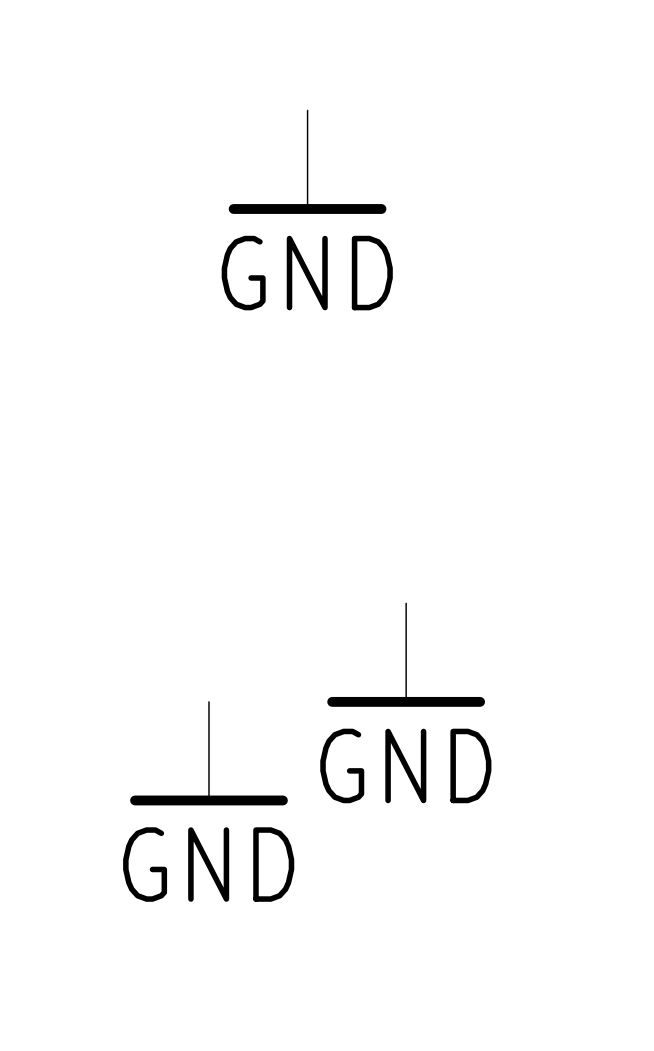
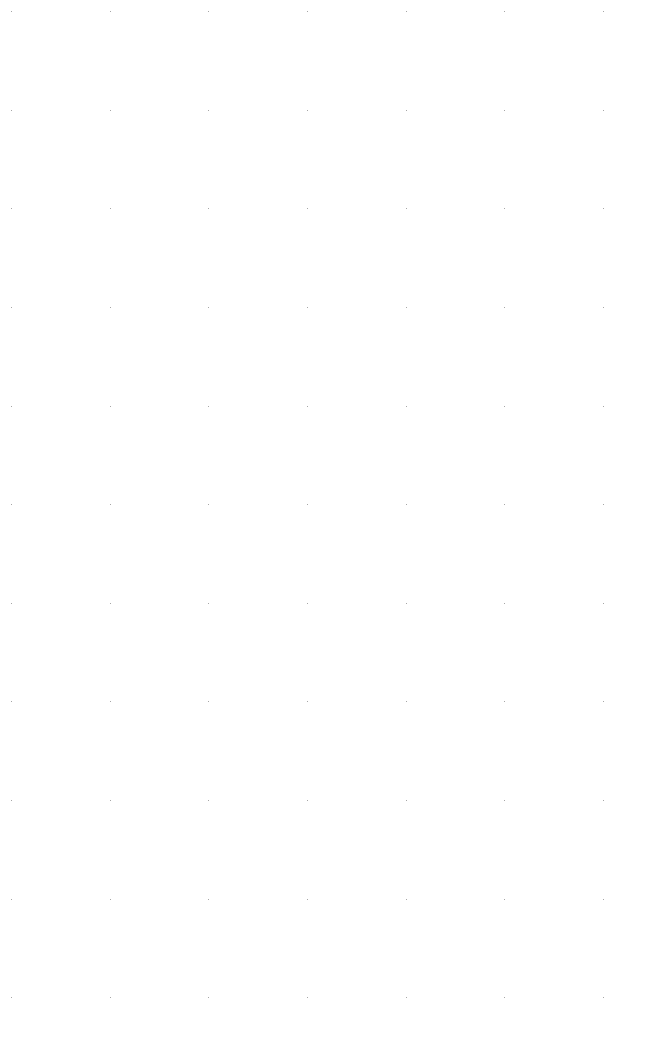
power symbol: GND (307, 162) -> none
power symbol: GND (406, 655) -> none
power symbol: GND (208, 753) -> none

